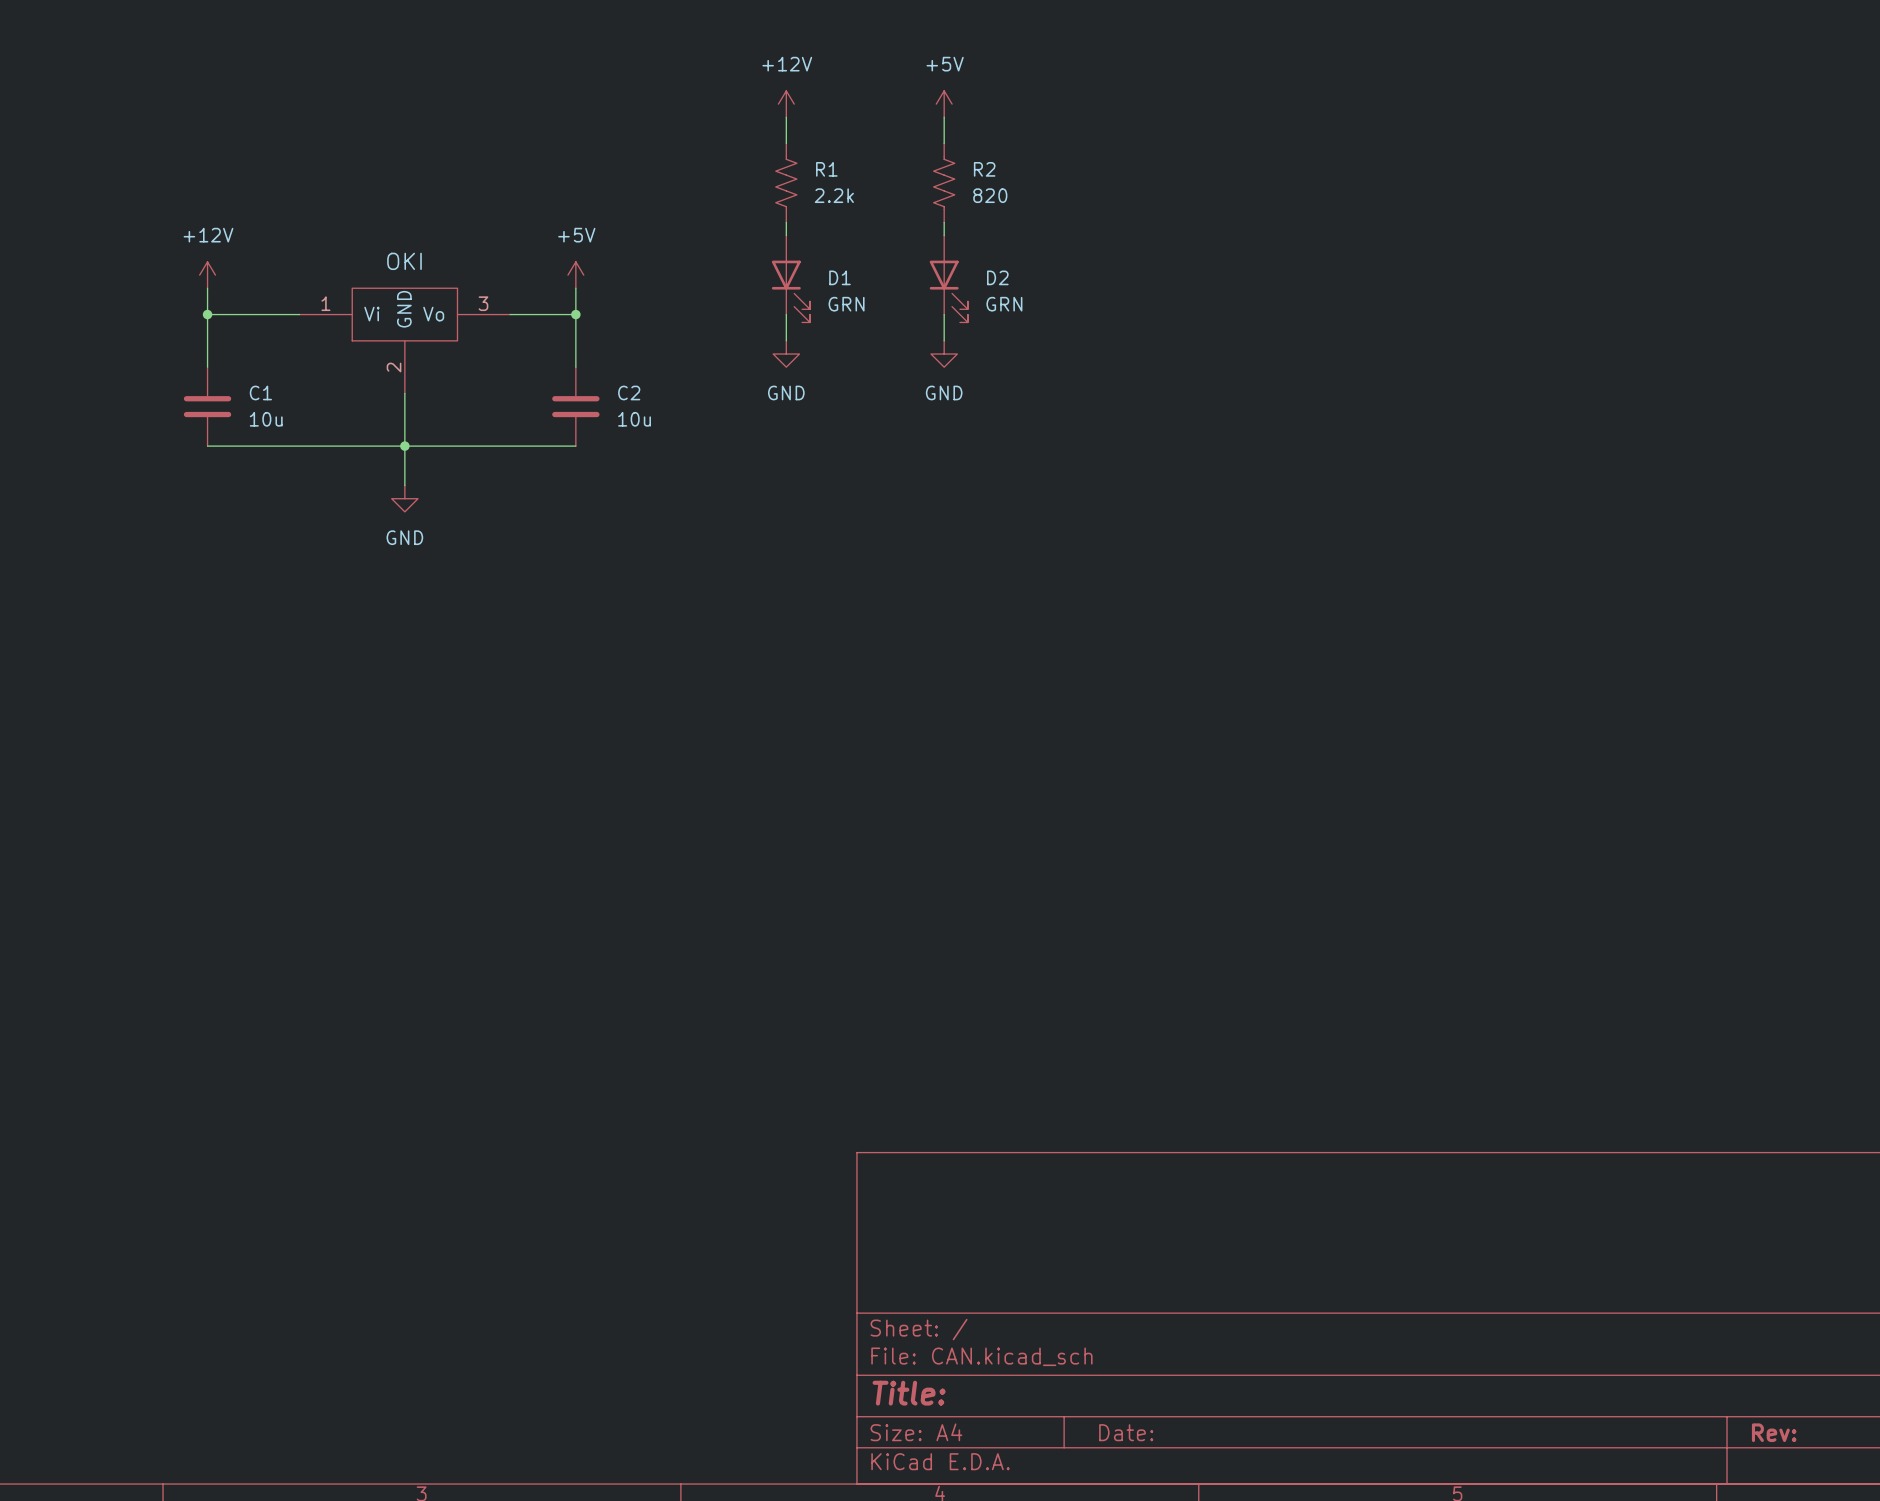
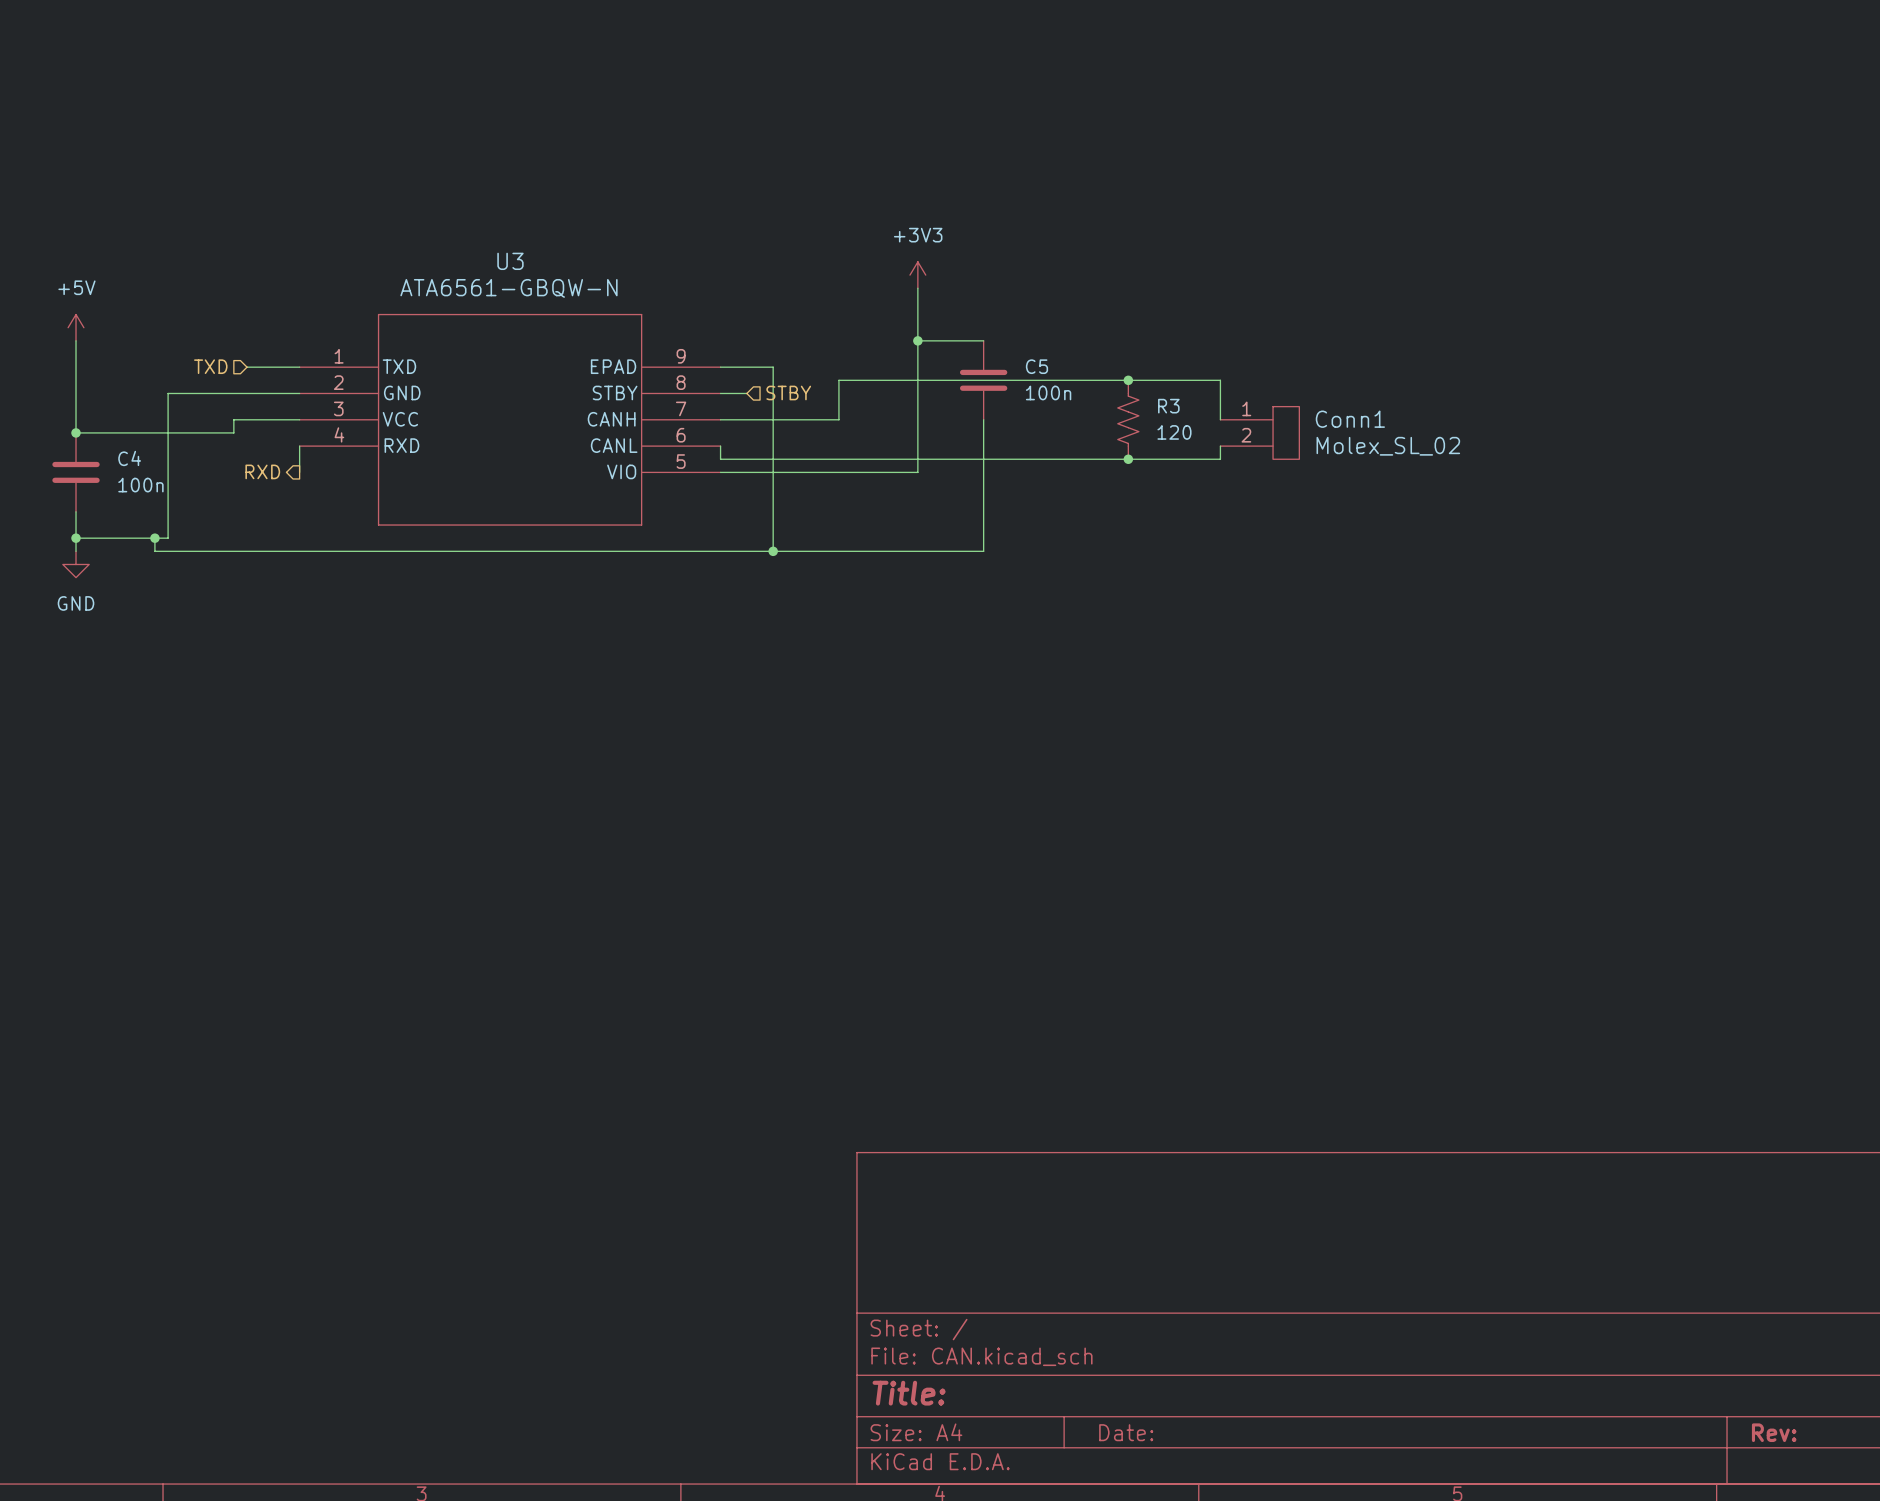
power symbol: +12V (786, 104) -> none
power symbol: +5V (944, 104) -> none
wire: (786, 117) (786, 143) -> none
wire: (944, 117) (944, 143) -> none
R1: 2.2k (786, 183) -> none
R2: 820 (944, 183) -> none
wire: (786, 222) (786, 235) -> none
wire: (944, 222) (944, 235) -> none
power symbol: +12V (207, 275) -> none
power symbol: +5V (575, 275) -> none
power symbol: none -> +3V3 (917, 275)
D1: GRN (790, 279) -> none
D2: GRN (948, 279) -> none
wire: (207, 288) (207, 367) -> none
wire: (575, 288) (575, 367) -> none
wire: none -> (917, 288) (917, 472) (720, 472)
wire: (207, 314) (299, 314) -> none
junction: (207, 314) -> none
junction: (575, 314) -> none
wire: (786, 314) (786, 340) -> none
wire: (944, 314) (944, 340) -> none
power symbol: none -> +5V (76, 327)
wire: none -> (76, 340) (76, 432) (233, 432) (233, 419) (299, 419)
part: OKI (404, 340) -> none
wire: none -> (917, 340) (983, 340)
junction: none -> (917, 340)
power symbol: GND (786, 354) -> none
power symbol: GND (944, 354) -> none
hierarchical label: none -> TXD (210, 366)
wire: none -> (247, 367) (299, 367)
wire: none -> (720, 367) (773, 367) (773, 551)
C5: none -> 100n (983, 380)
junction: none -> (1128, 380)
hierarchical label: none -> STBY (788, 392)
wire: none -> (299, 393) (168, 393) (168, 538) (76, 538)
wire: (404, 393) (404, 485) -> none
wire: none -> (720, 393) (746, 393)
C1: 10u (207, 406) -> none
C2: 10u (575, 406) -> none
U3: none -> ATA6561-GBQW-N (510, 419)
wire: none -> (720, 419) (838, 419) (838, 380) (1220, 380) (1220, 419)
wire: none -> (983, 419) (983, 551) (154, 551) (154, 538)
R3: none -> 120 (1128, 419)
junction: none -> (76, 432)
Conn1: none -> Molex_SL_02 (1259, 432)
wire: (207, 446) (575, 446) -> none
wire: none -> (299, 446) (299, 472)
junction: (404, 446) -> none
wire: none -> (720, 446) (720, 459) (1220, 459) (1220, 446)
junction: none -> (1128, 459)
hierarchical label: none -> RXD (262, 471)
C4: none -> 100n (76, 472)
power symbol: GND (404, 498) -> none
wire: none -> (76, 511) (76, 551)
junction: none -> (76, 538)
junction: none -> (154, 538)
junction: none -> (773, 551)
power symbol: none -> GND (76, 564)

